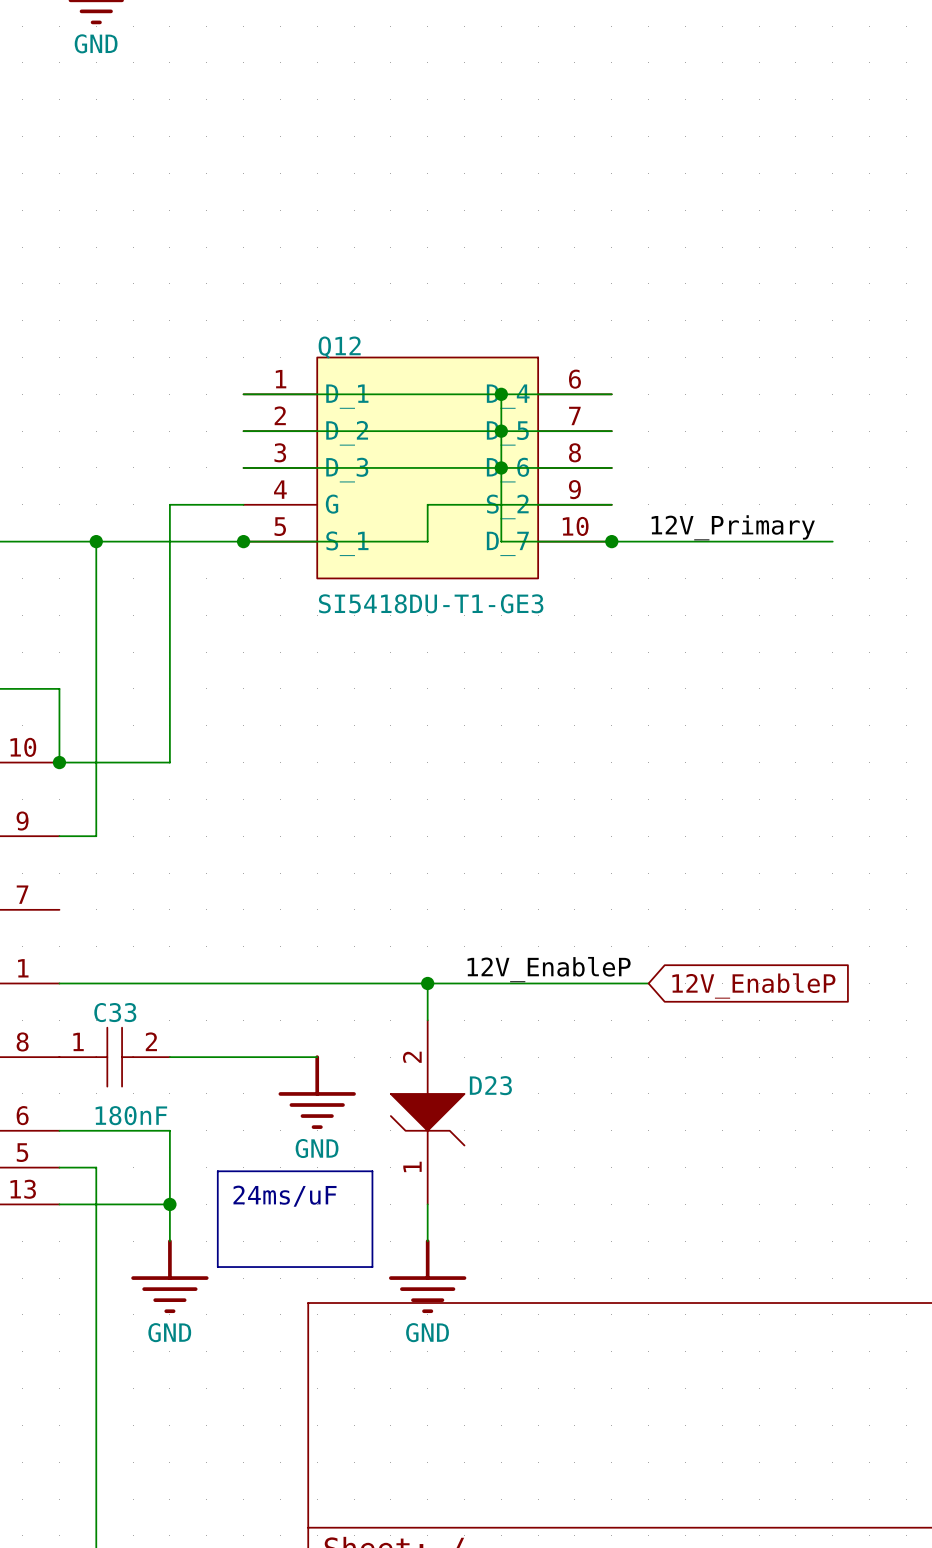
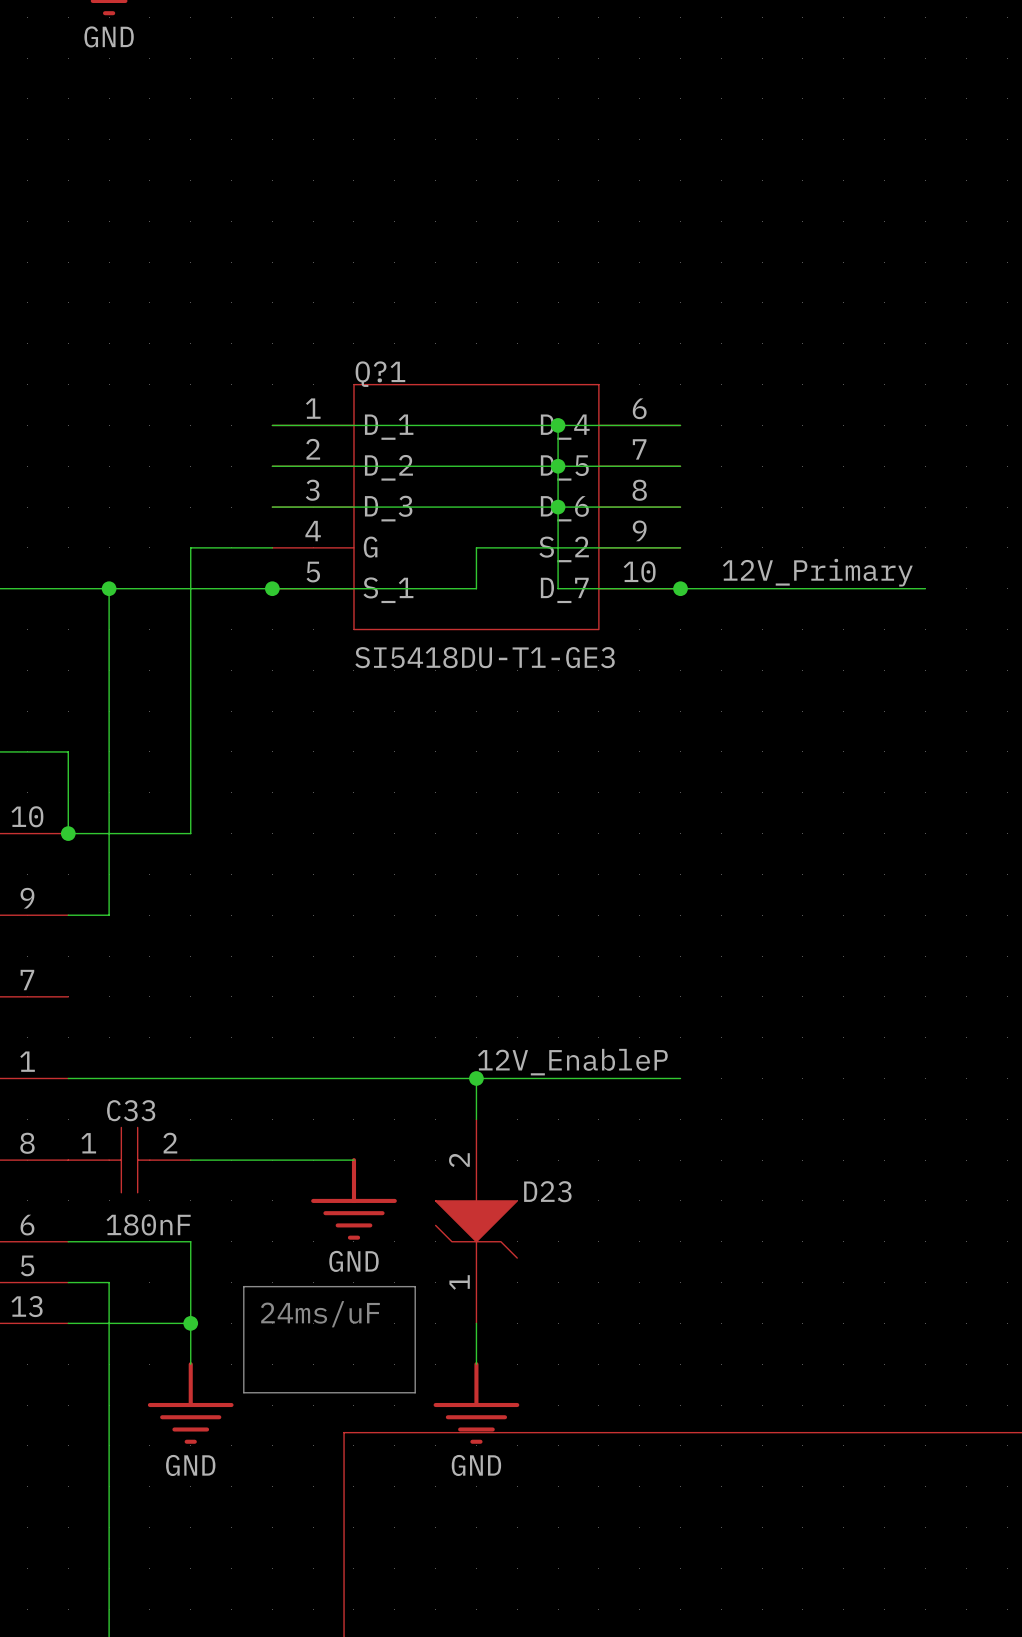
Q12 name: Q12 (339, 347) -> Q?1 (380, 374)
label position: 12V_EnableP (549, 969) -> 12V_EnableP (572, 1062)
wire: (611, 983) (648, 983) -> none
global label: 12V_EnableP (753, 986) -> none

